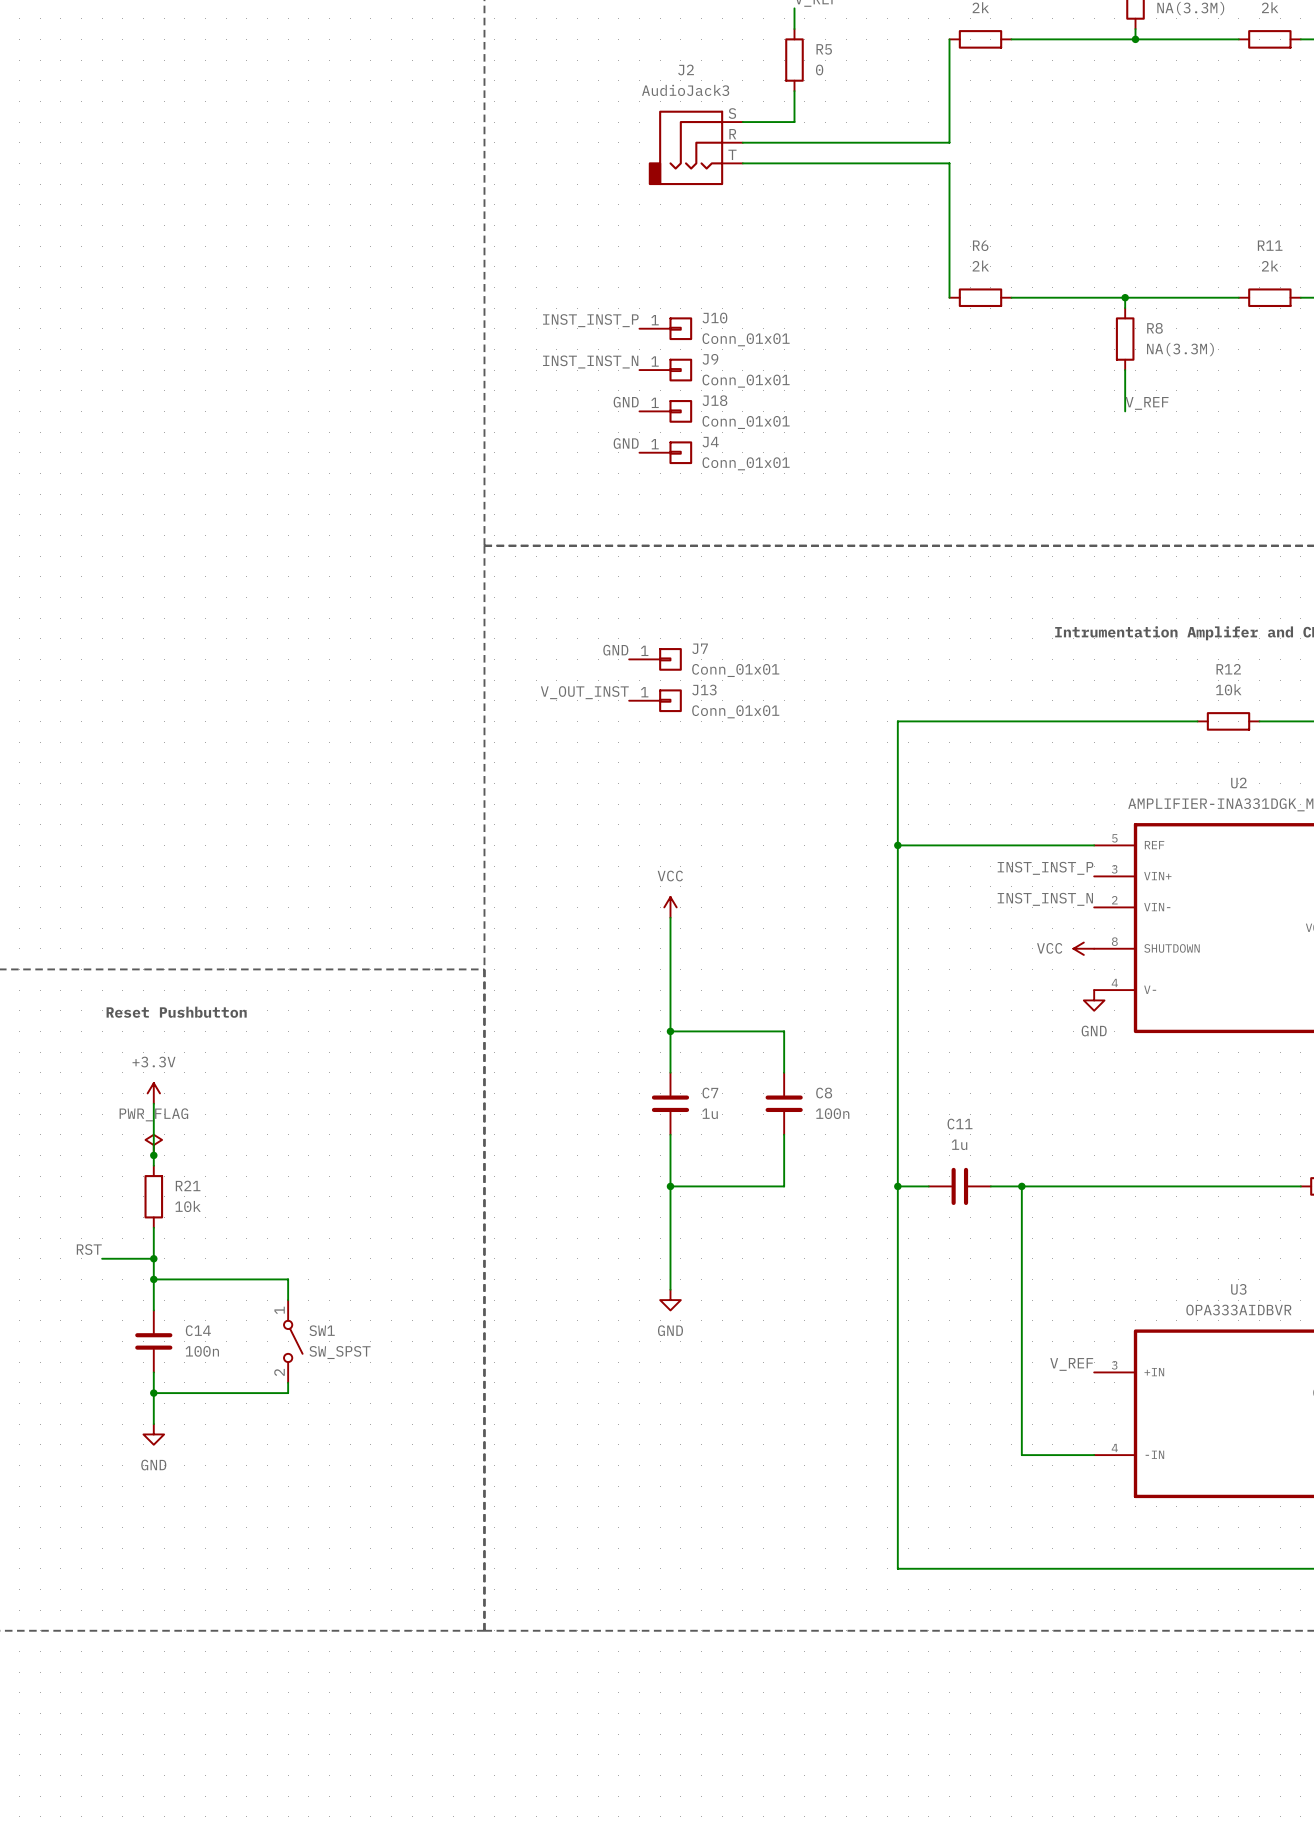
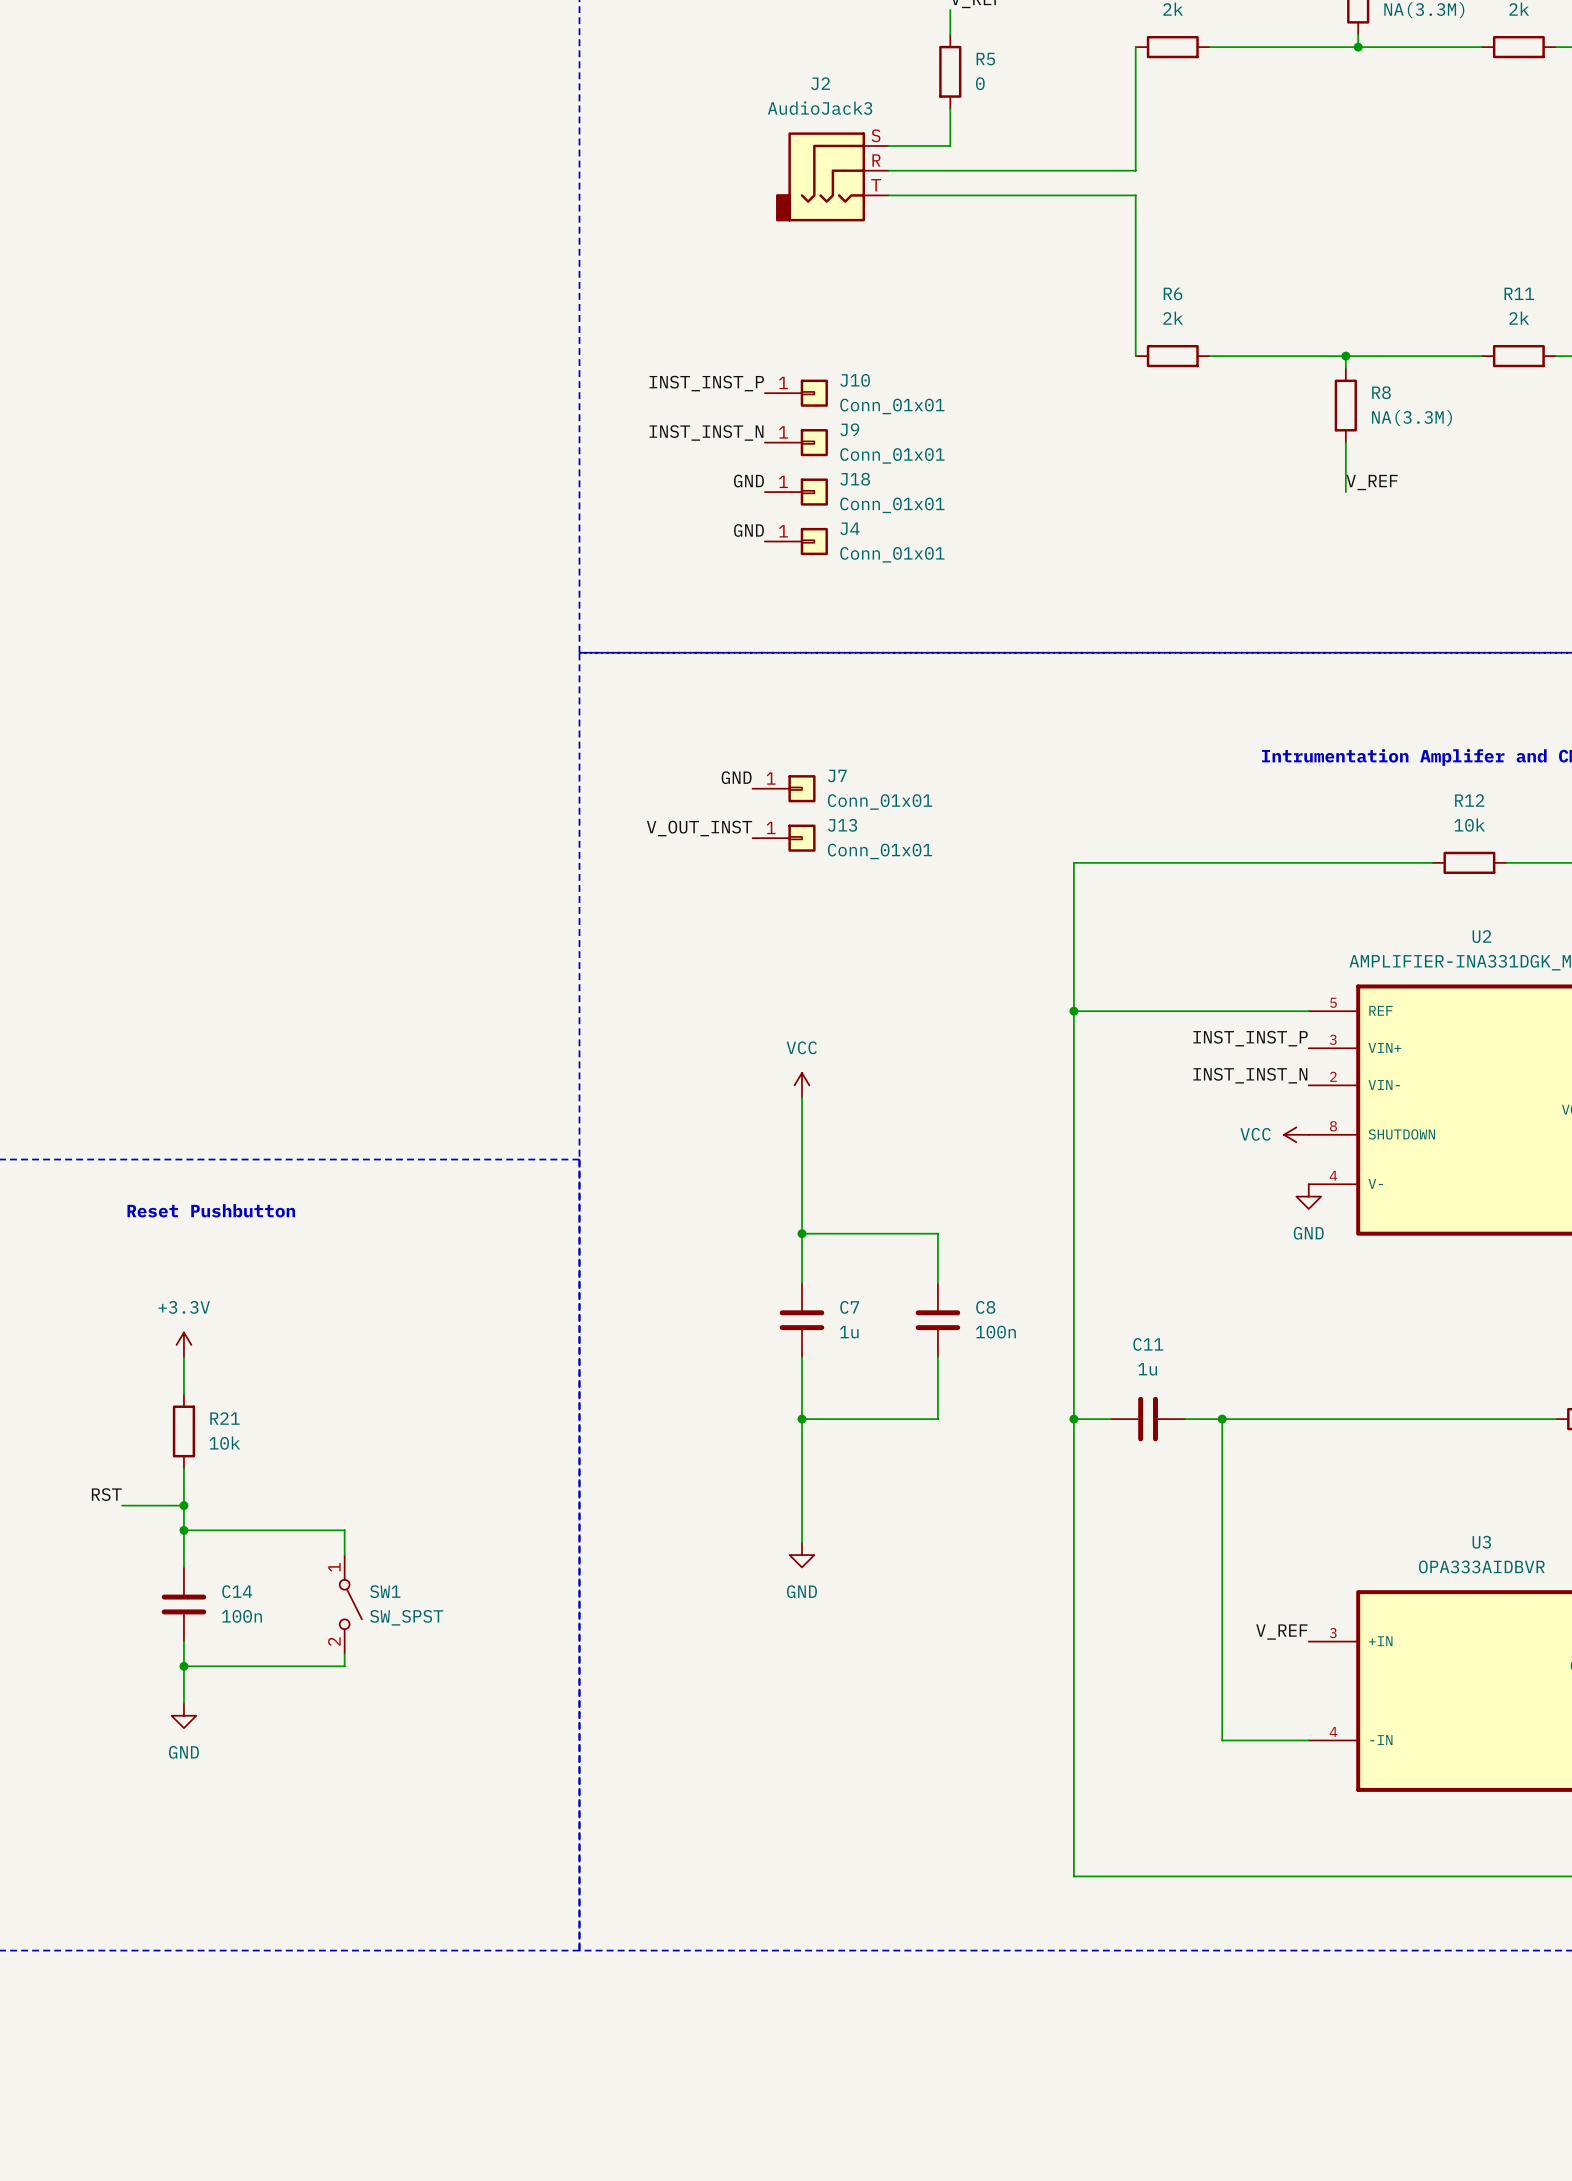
power symbol position: +3.3V (153, 1093) -> +3.3V (183, 1344)
power symbol: PWR_FLAG (153, 1145) -> none
junction: (153, 1155) -> none

